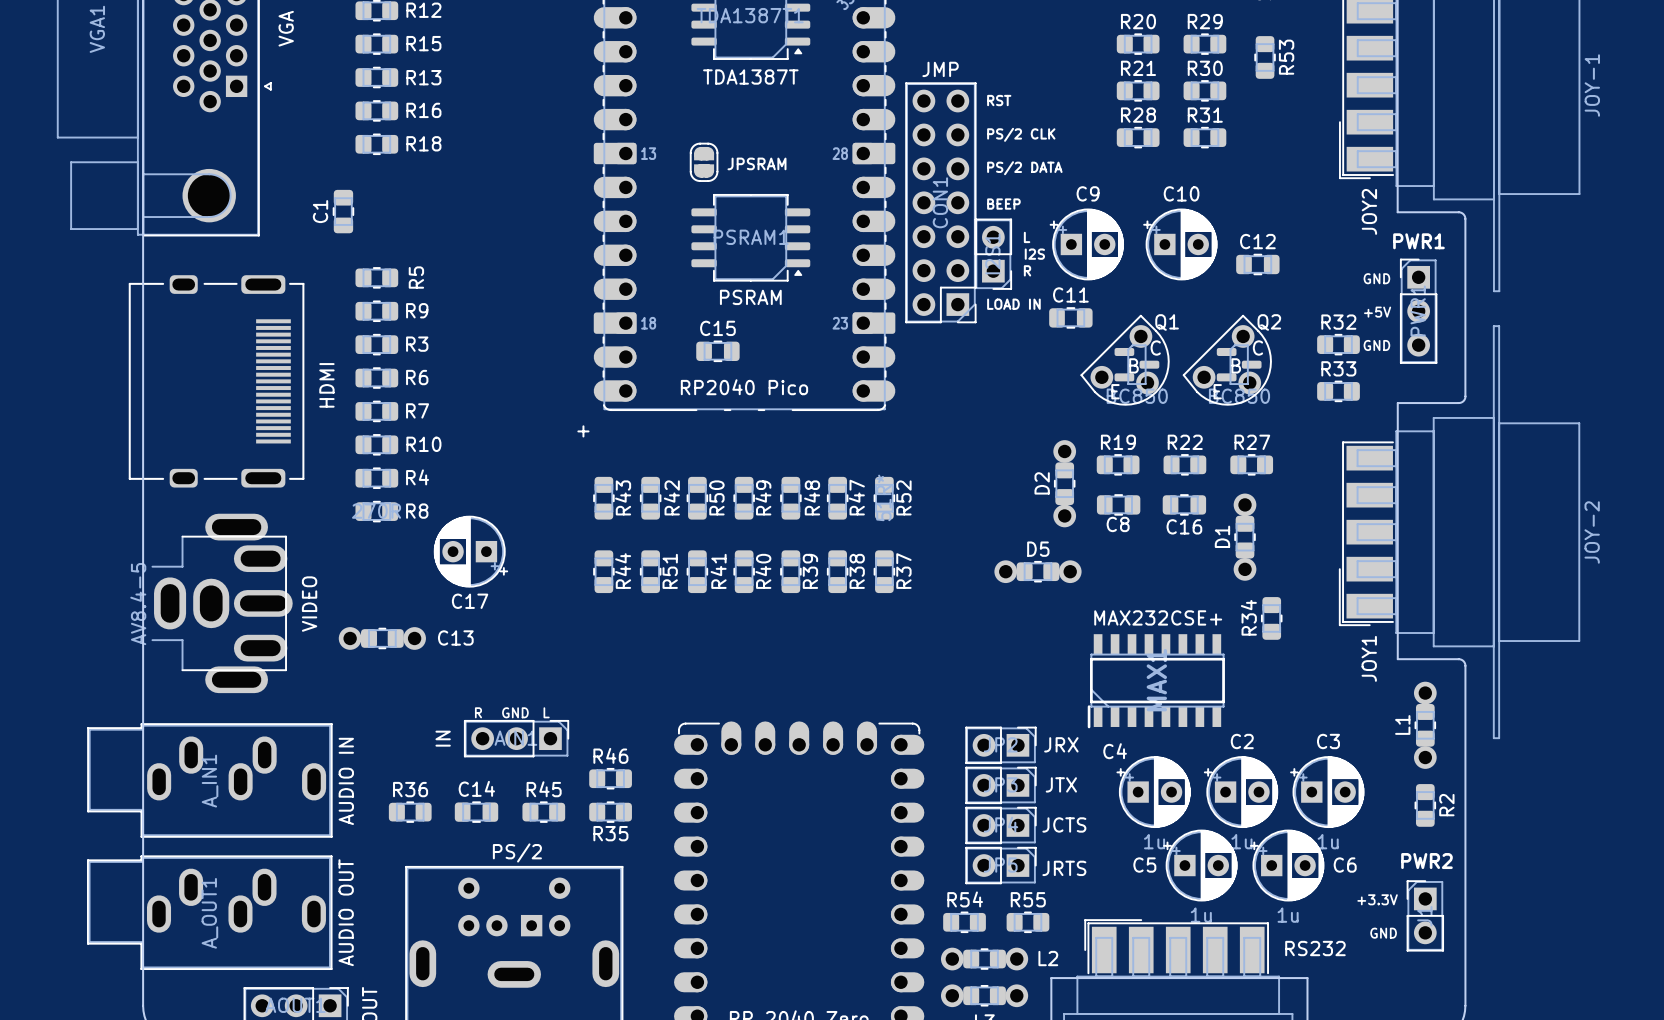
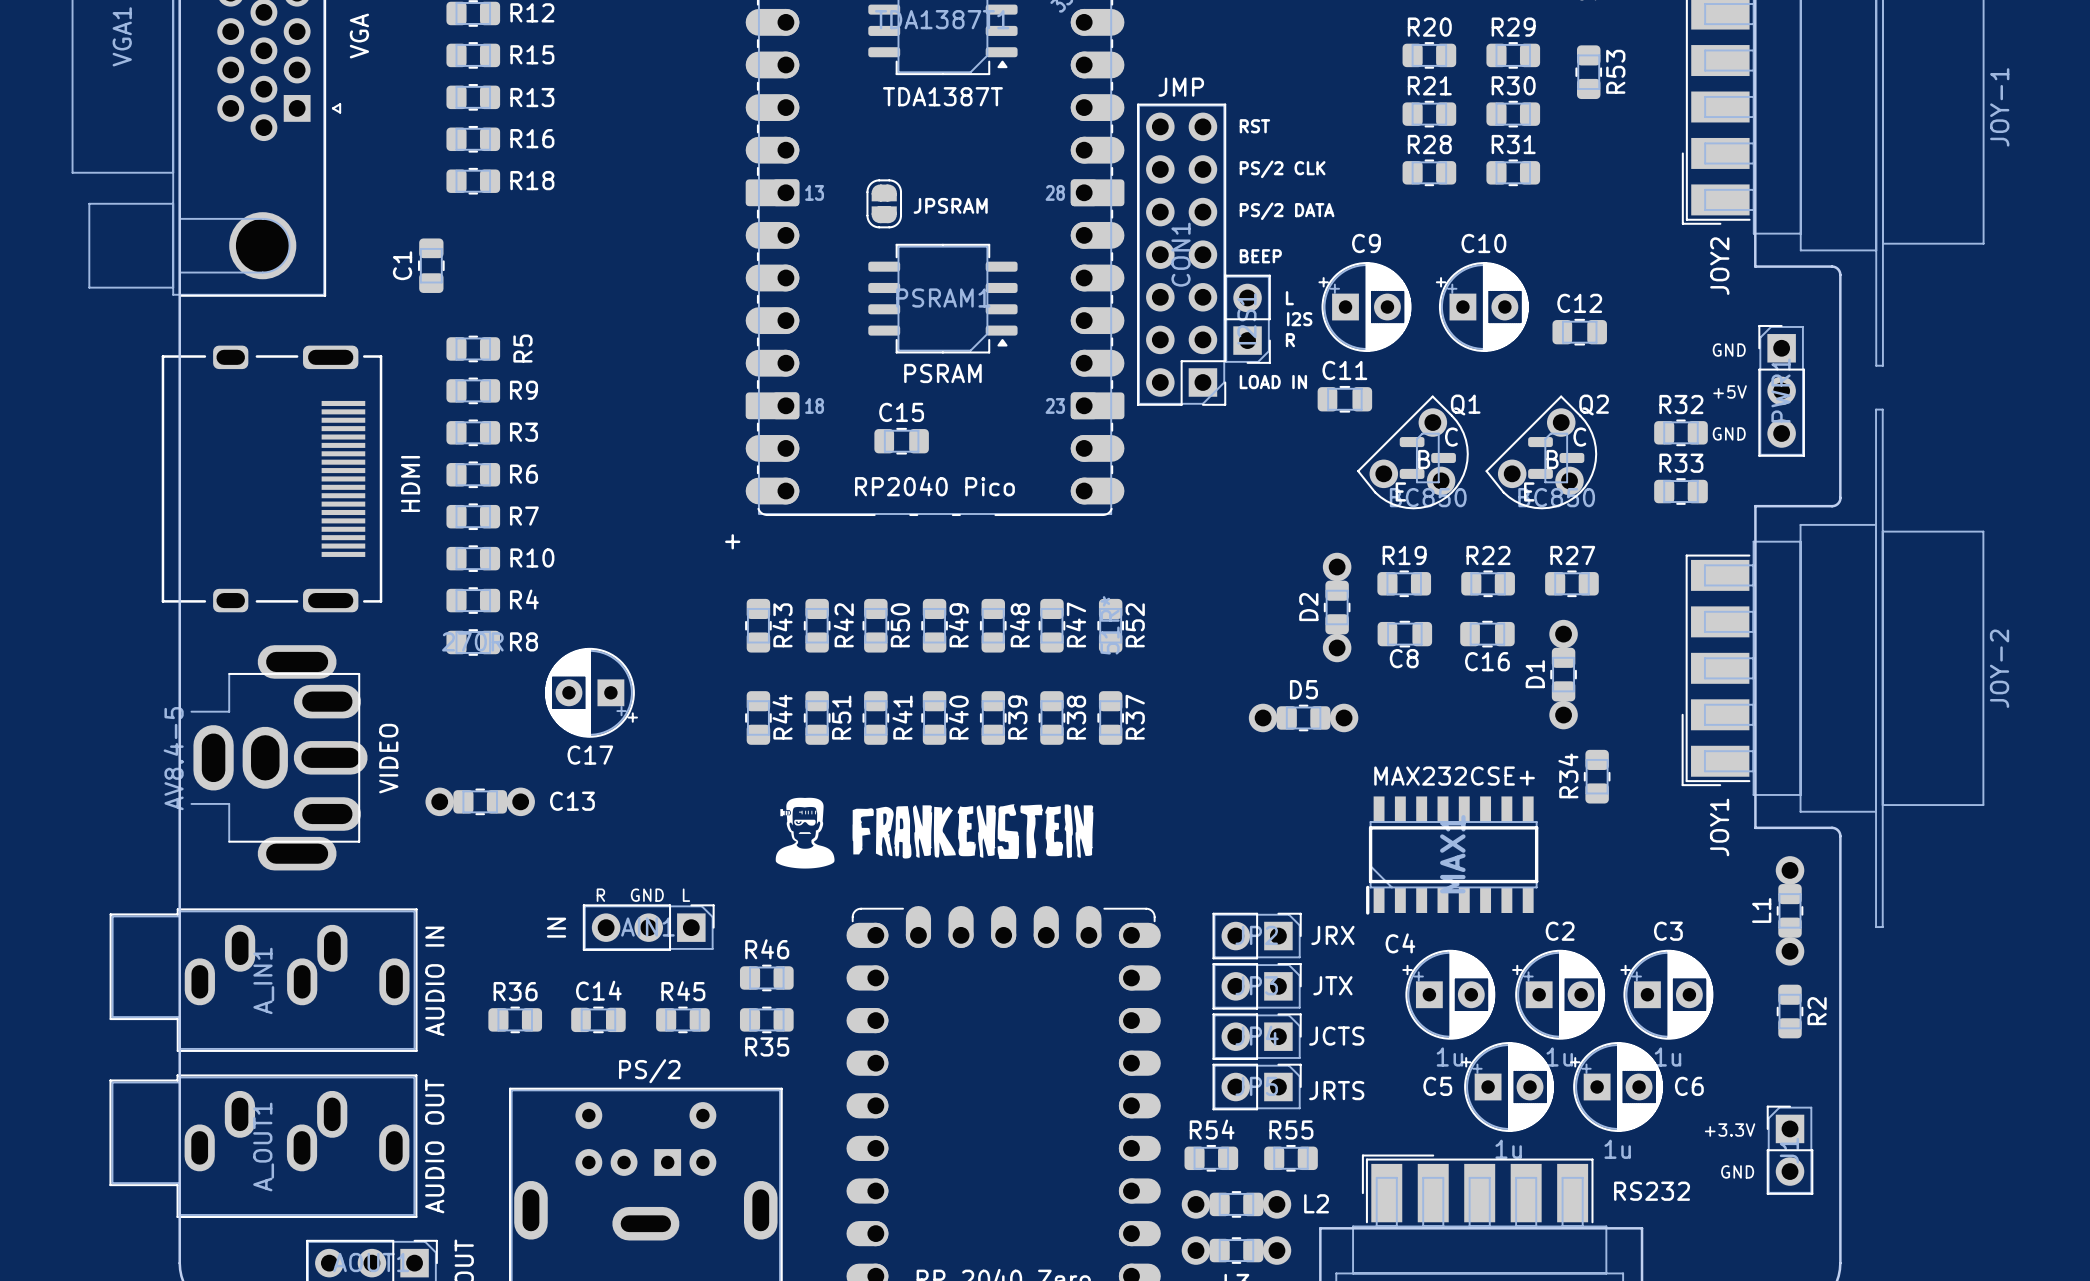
text: PWR1 (1418, 241) -> none
drawing: none -> [775, 797, 1094, 869]
text: PWR2 (1426, 861) -> none

